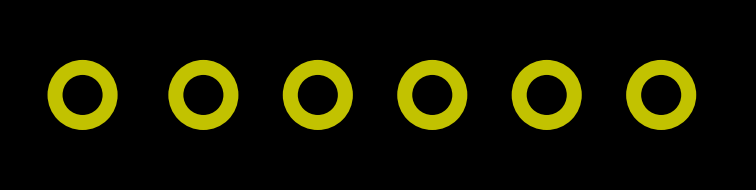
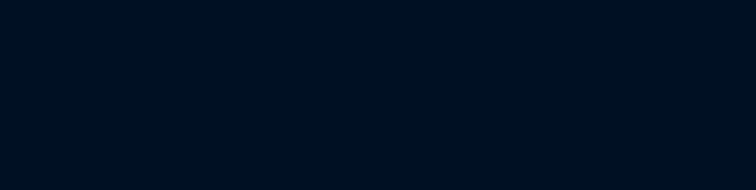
part: (82, 94) -> none
part: (203, 94) -> none
part: (317, 94) -> none
part: (432, 94) -> none
part: (546, 94) -> none
part: (661, 94) -> none

